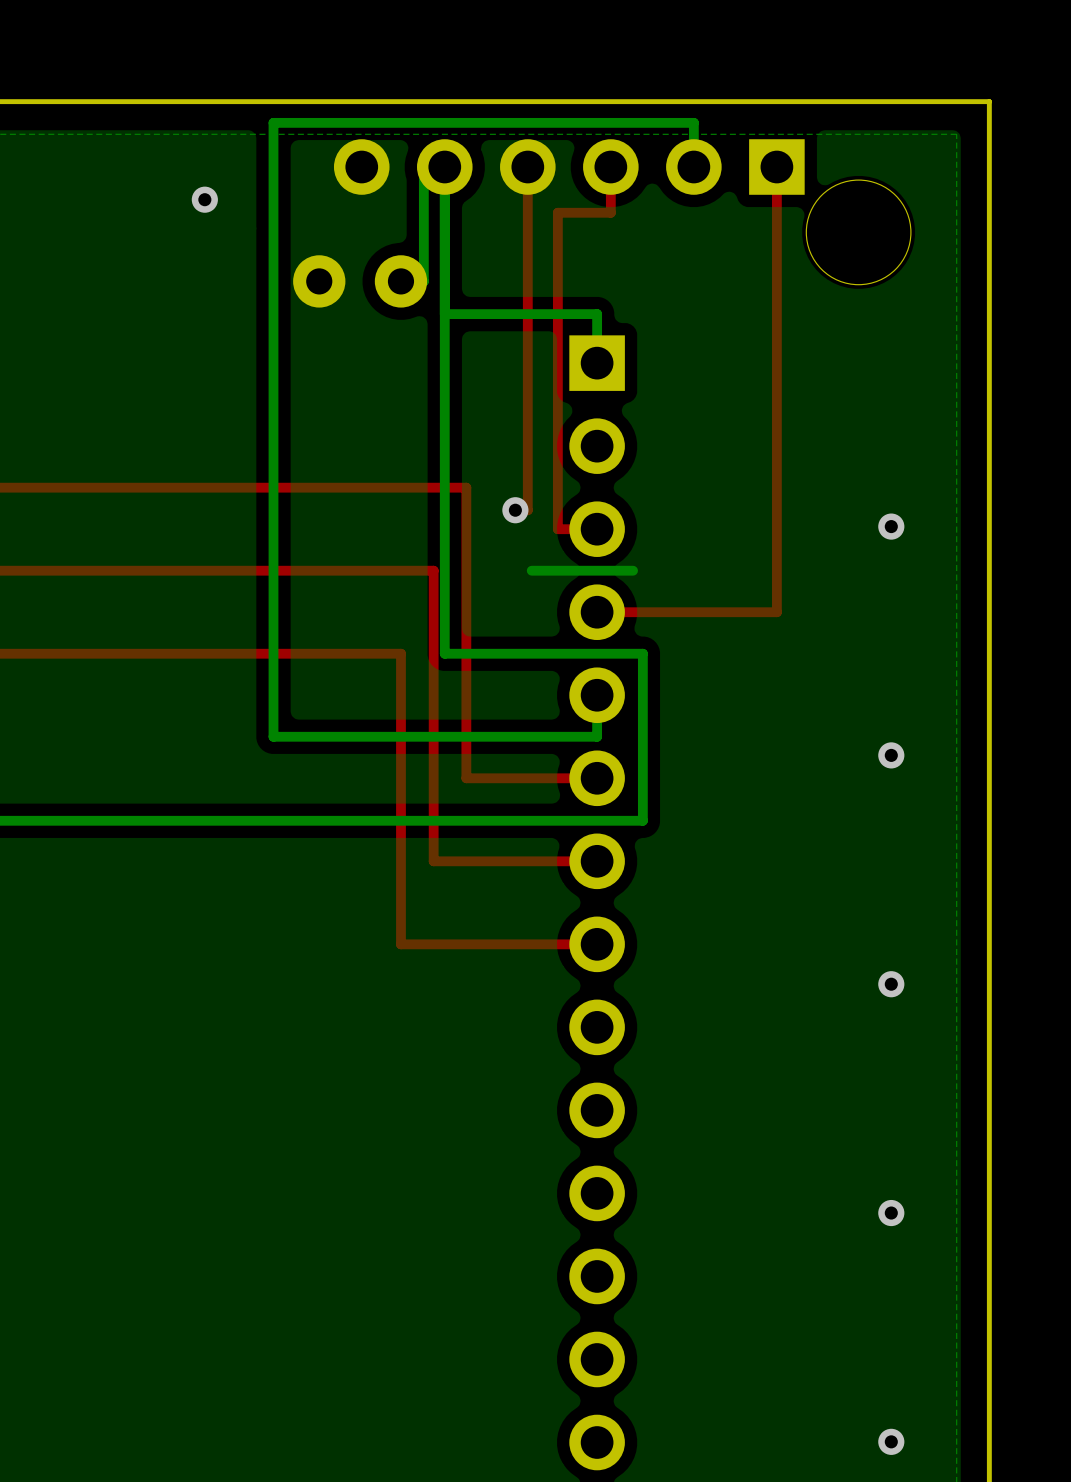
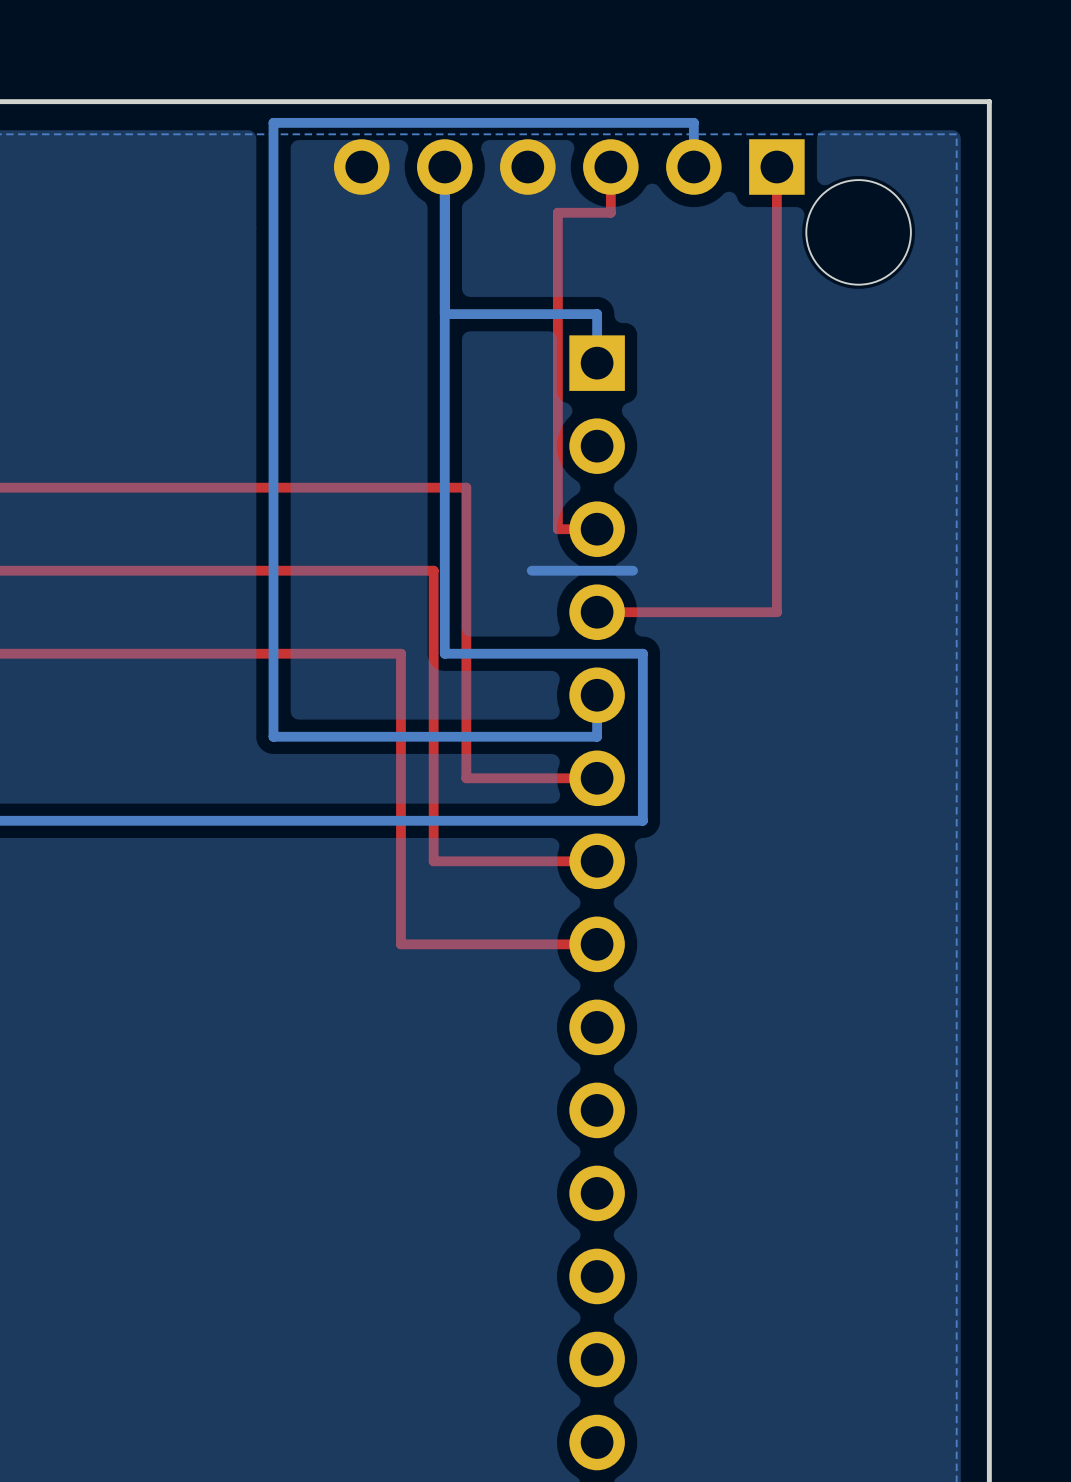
bottom track: (444, 167) (423, 167) (423, 281) (400, 281) -> none
top track: (527, 167) (527, 510) (515, 510) -> none
via: (204, 199) -> none
part: (360, 281) -> none
via: (515, 510) -> none
via: (891, 526) -> none
via: (891, 755) -> none
via: (891, 984) -> none
via: (891, 1213) -> none
via: (891, 1441) -> none

